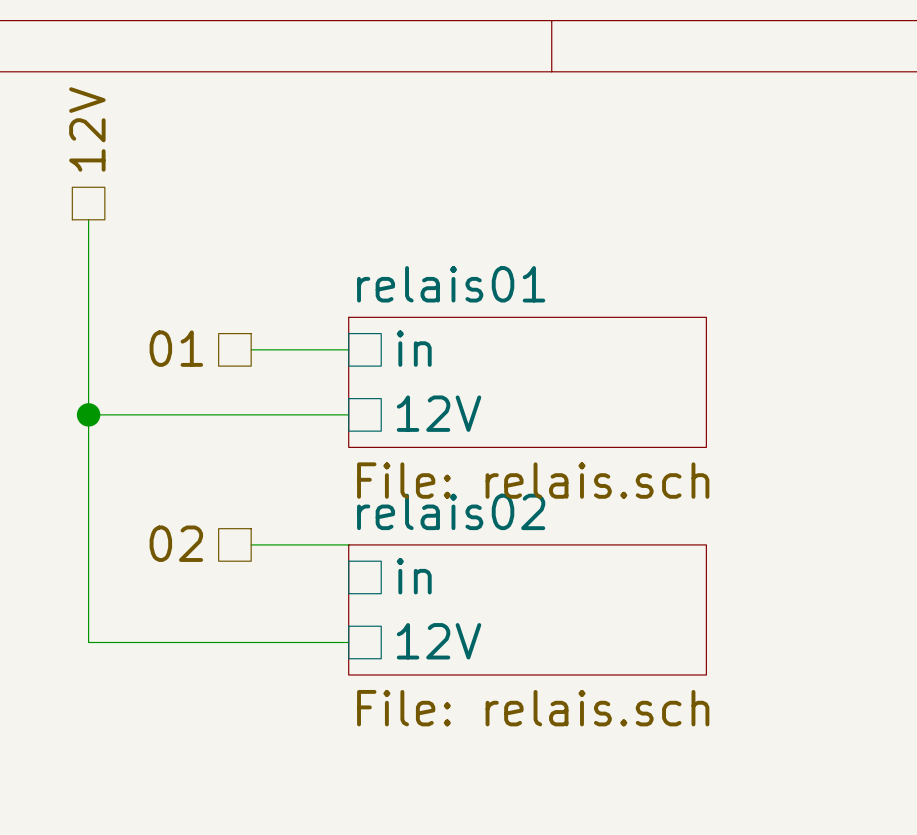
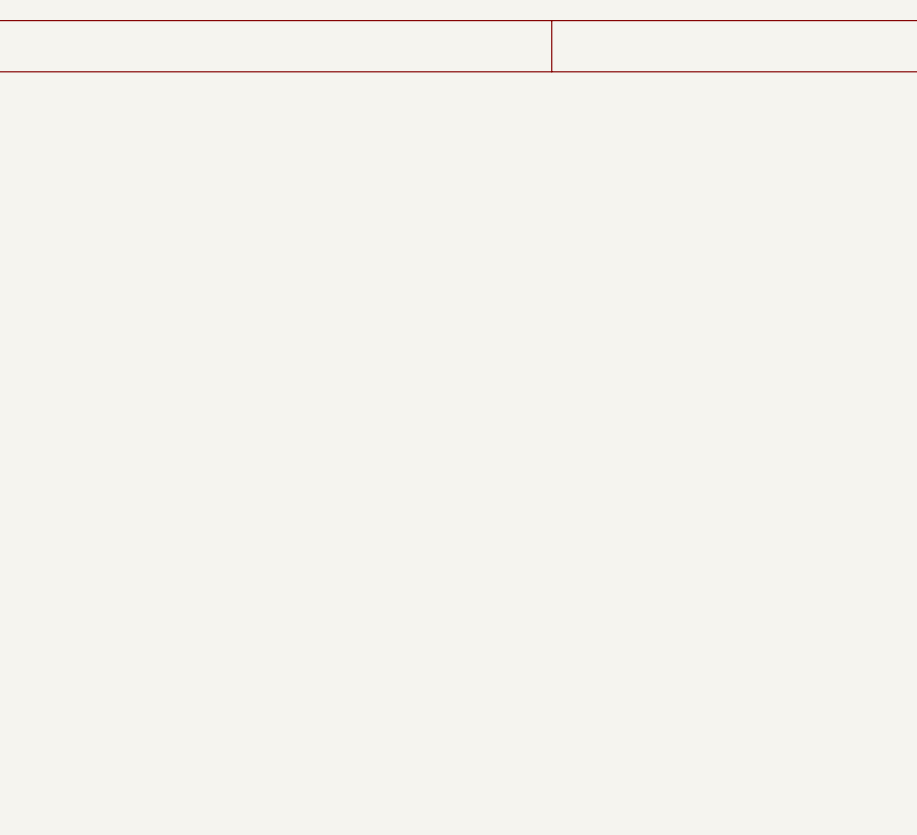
hierarchical label: 12V (87, 129) -> none
wire: (88, 219) (88, 642) (348, 642) -> none
hierarchical label: 01 (176, 348) -> none
sheet pin: in (414, 348) -> none
wire: (251, 349) (348, 349) -> none
sheet relais01: File: relais.sch (527, 382) -> none
sheet pin: 12V (439, 413) -> none
wire: (88, 414) (348, 414) -> none
junction: (88, 414) -> none
hierarchical label: 02 (176, 543) -> none
wire: (251, 544) (348, 544) -> none
sheet pin: in (414, 576) -> none
sheet relais02: File: relais.sch (527, 609) -> none
sheet pin: 12V (439, 641) -> none

